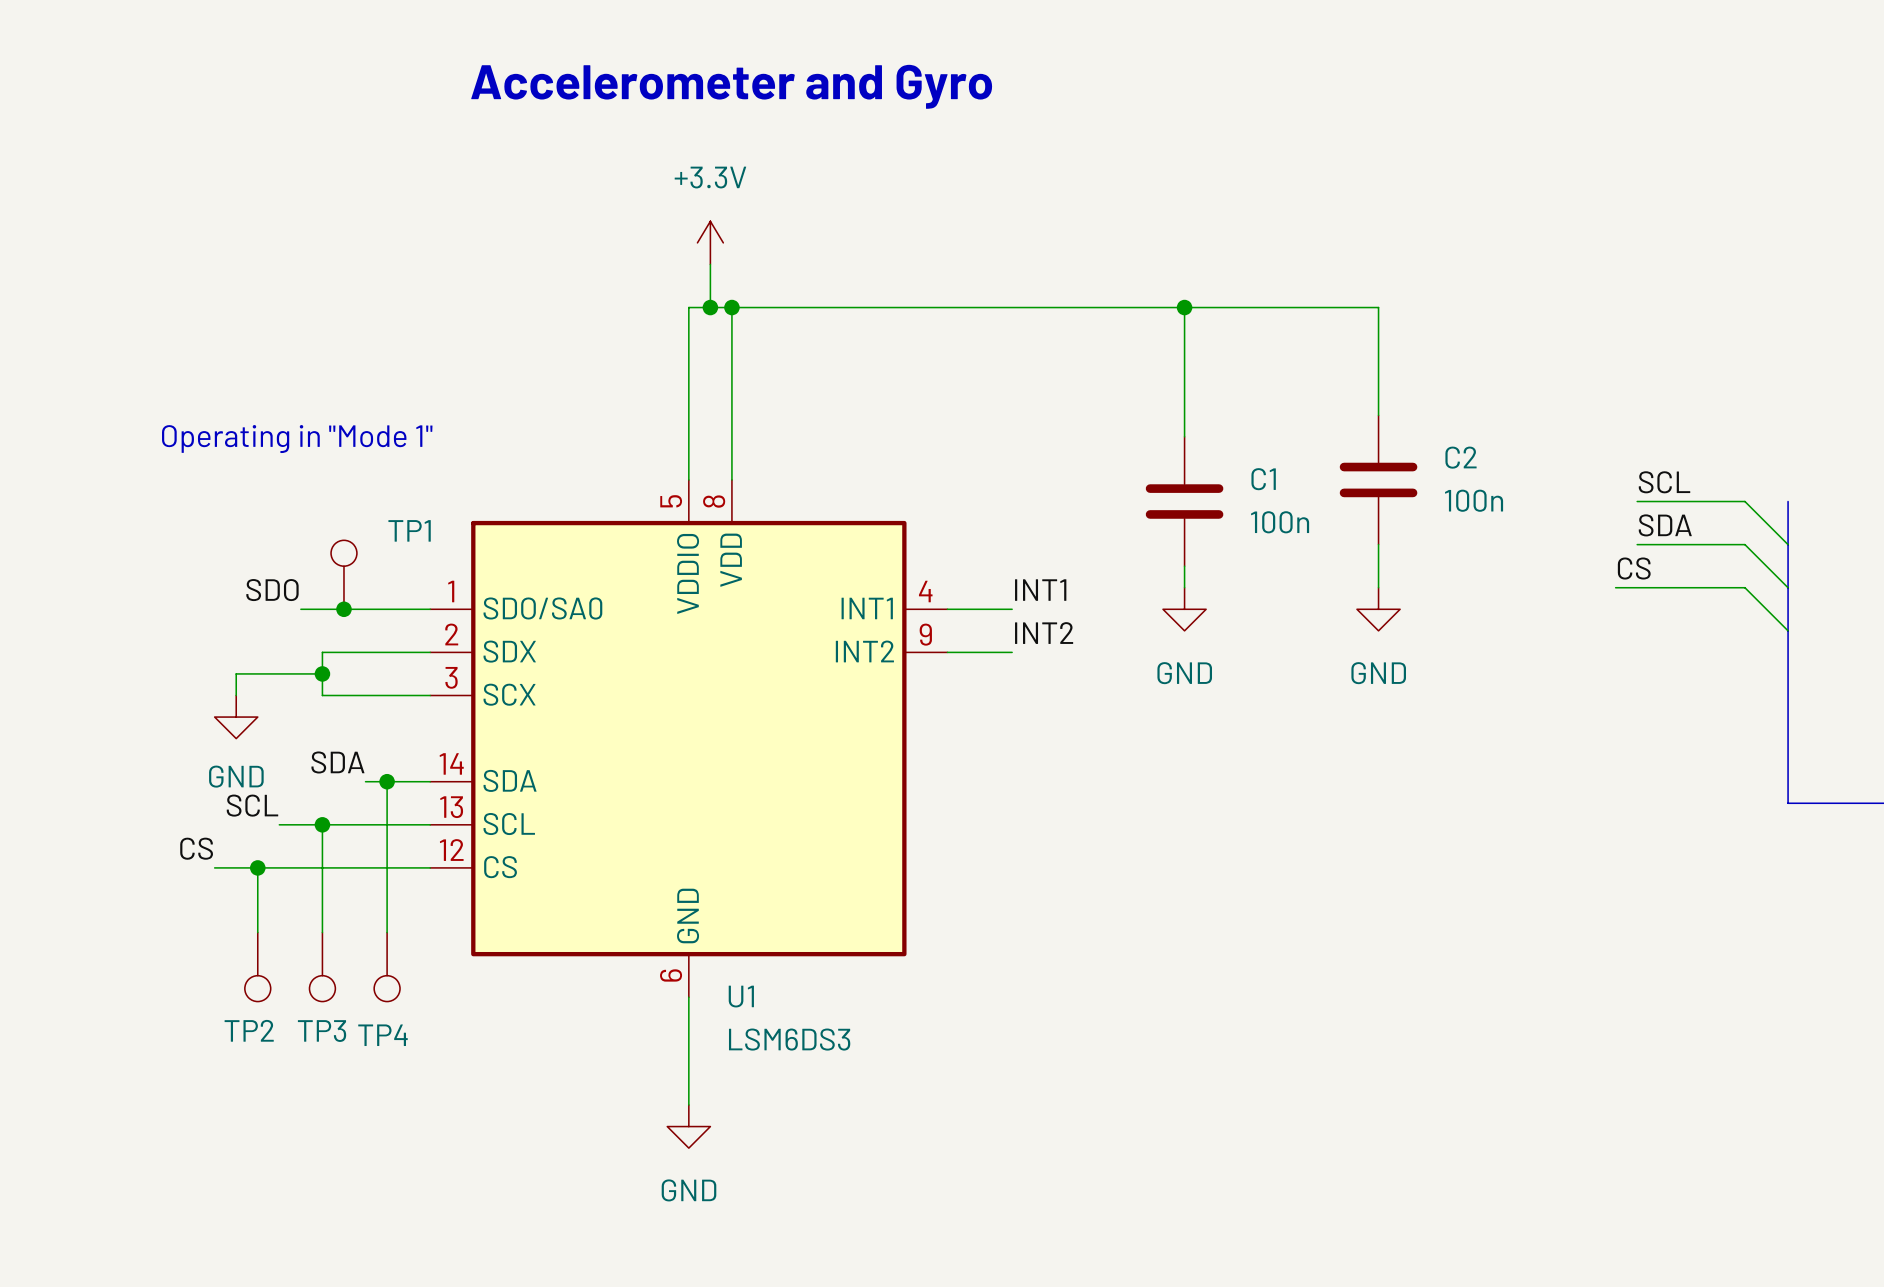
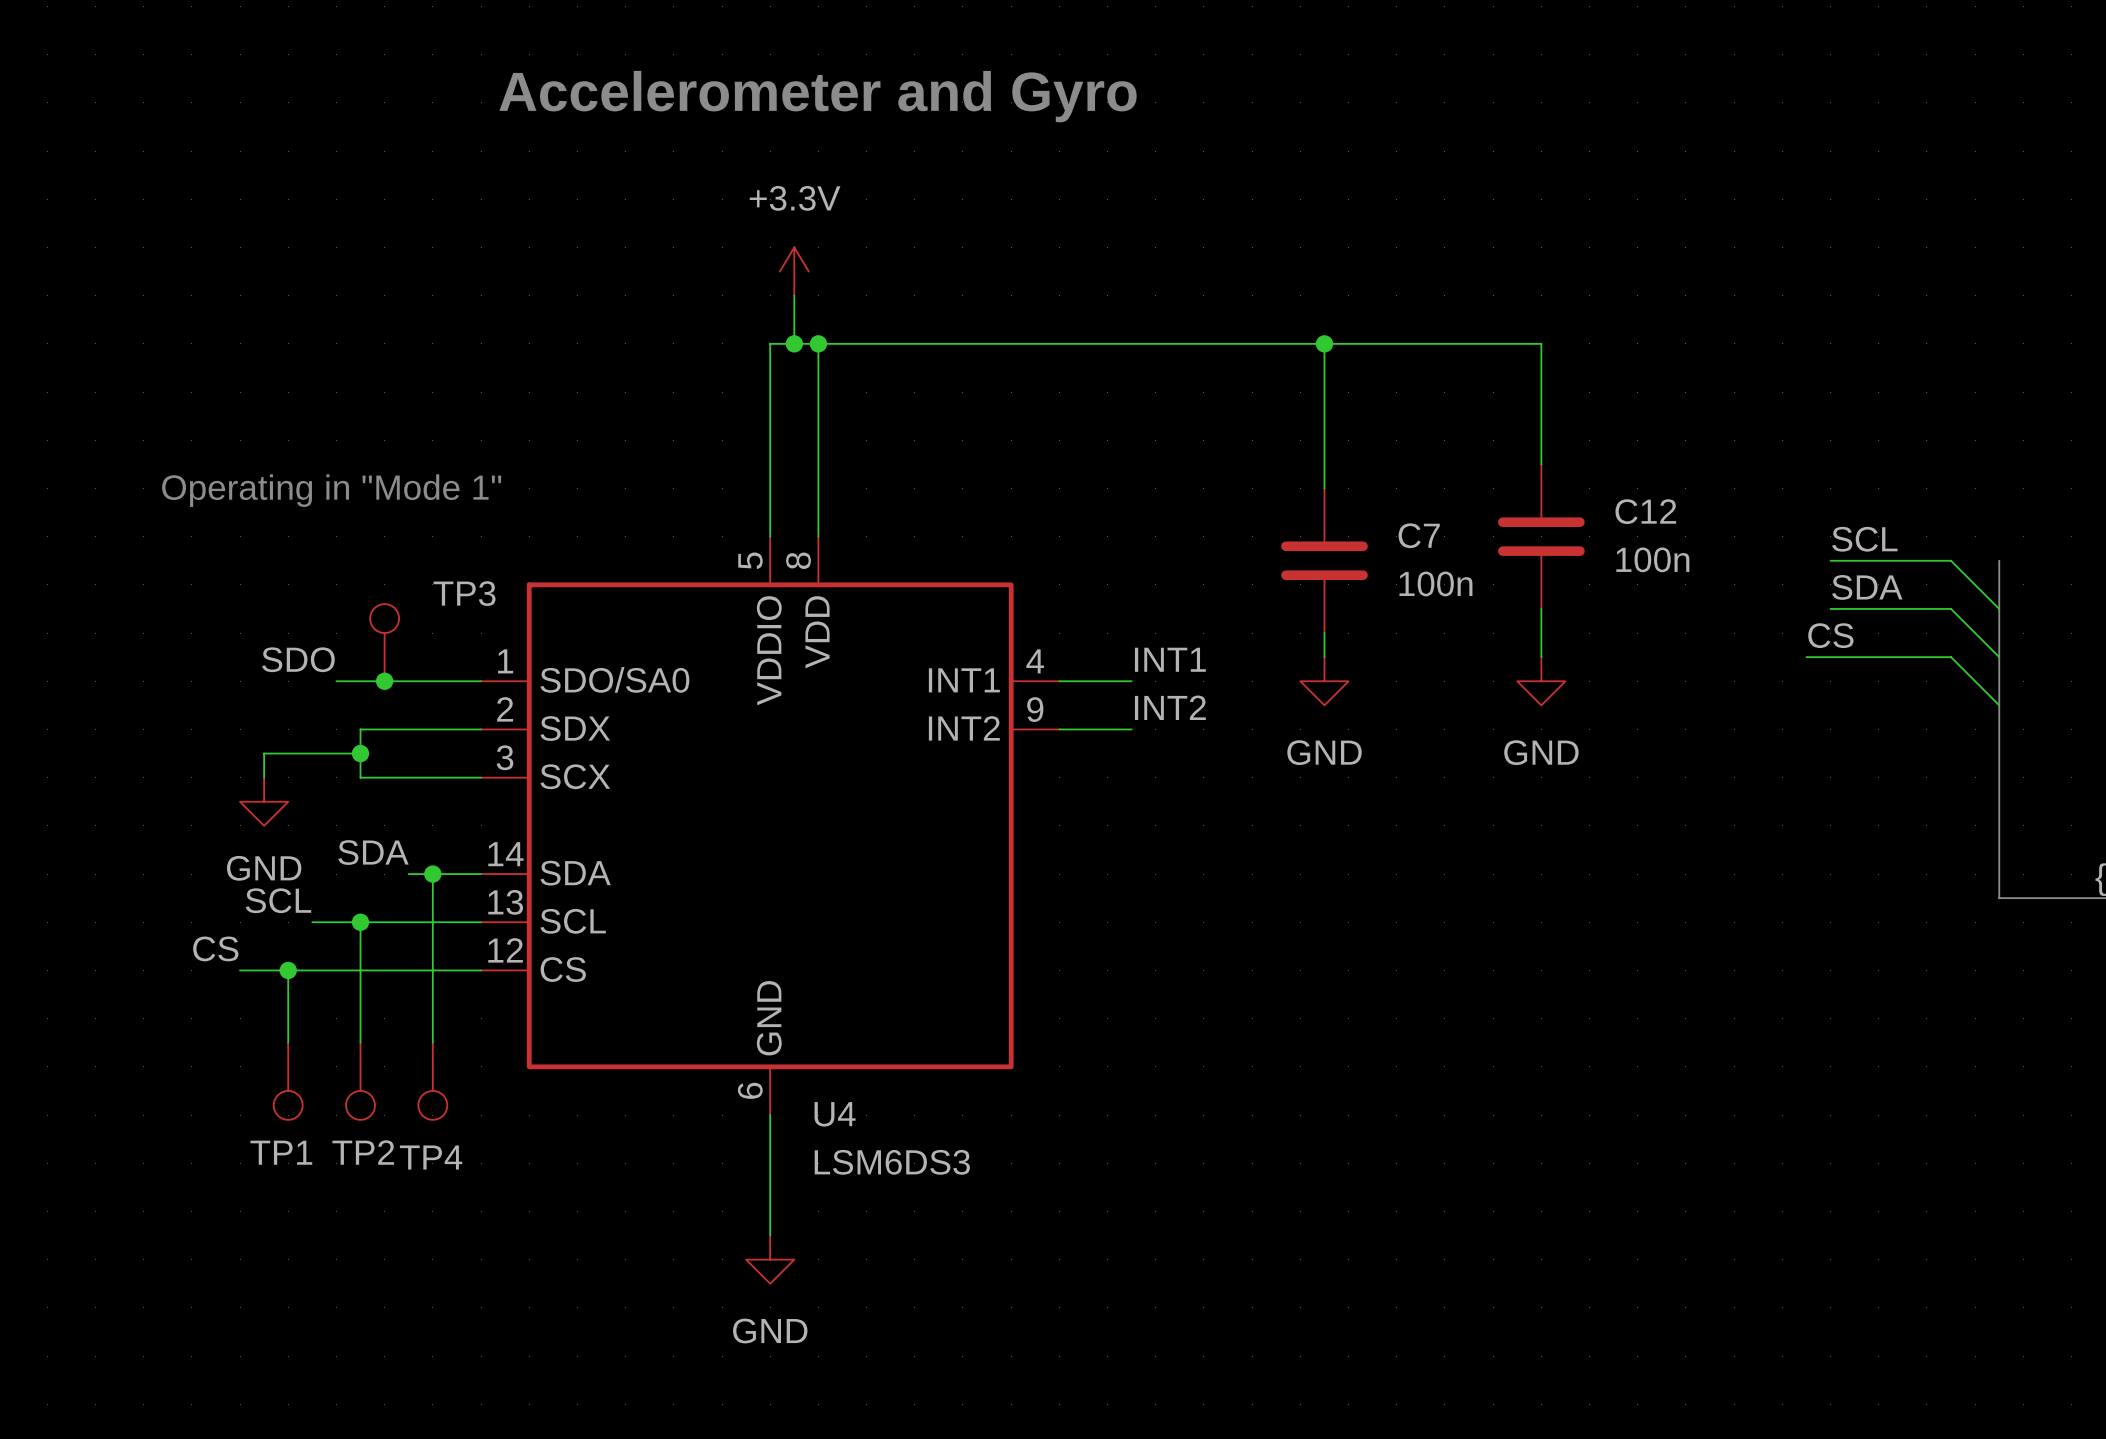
C2 name: C2 (1461, 457) -> C12 (1645, 511)
C1 name: C1 (1263, 479) -> C7 (1419, 535)
TP1 name: TP1 (409, 530) -> TP3 (464, 593)
U1 name: U1 (741, 996) -> U4 (835, 1114)
TP2 name: TP2 (249, 1030) -> TP1 (281, 1152)
TP3 name: TP3 (322, 1031) -> TP2 (363, 1152)

